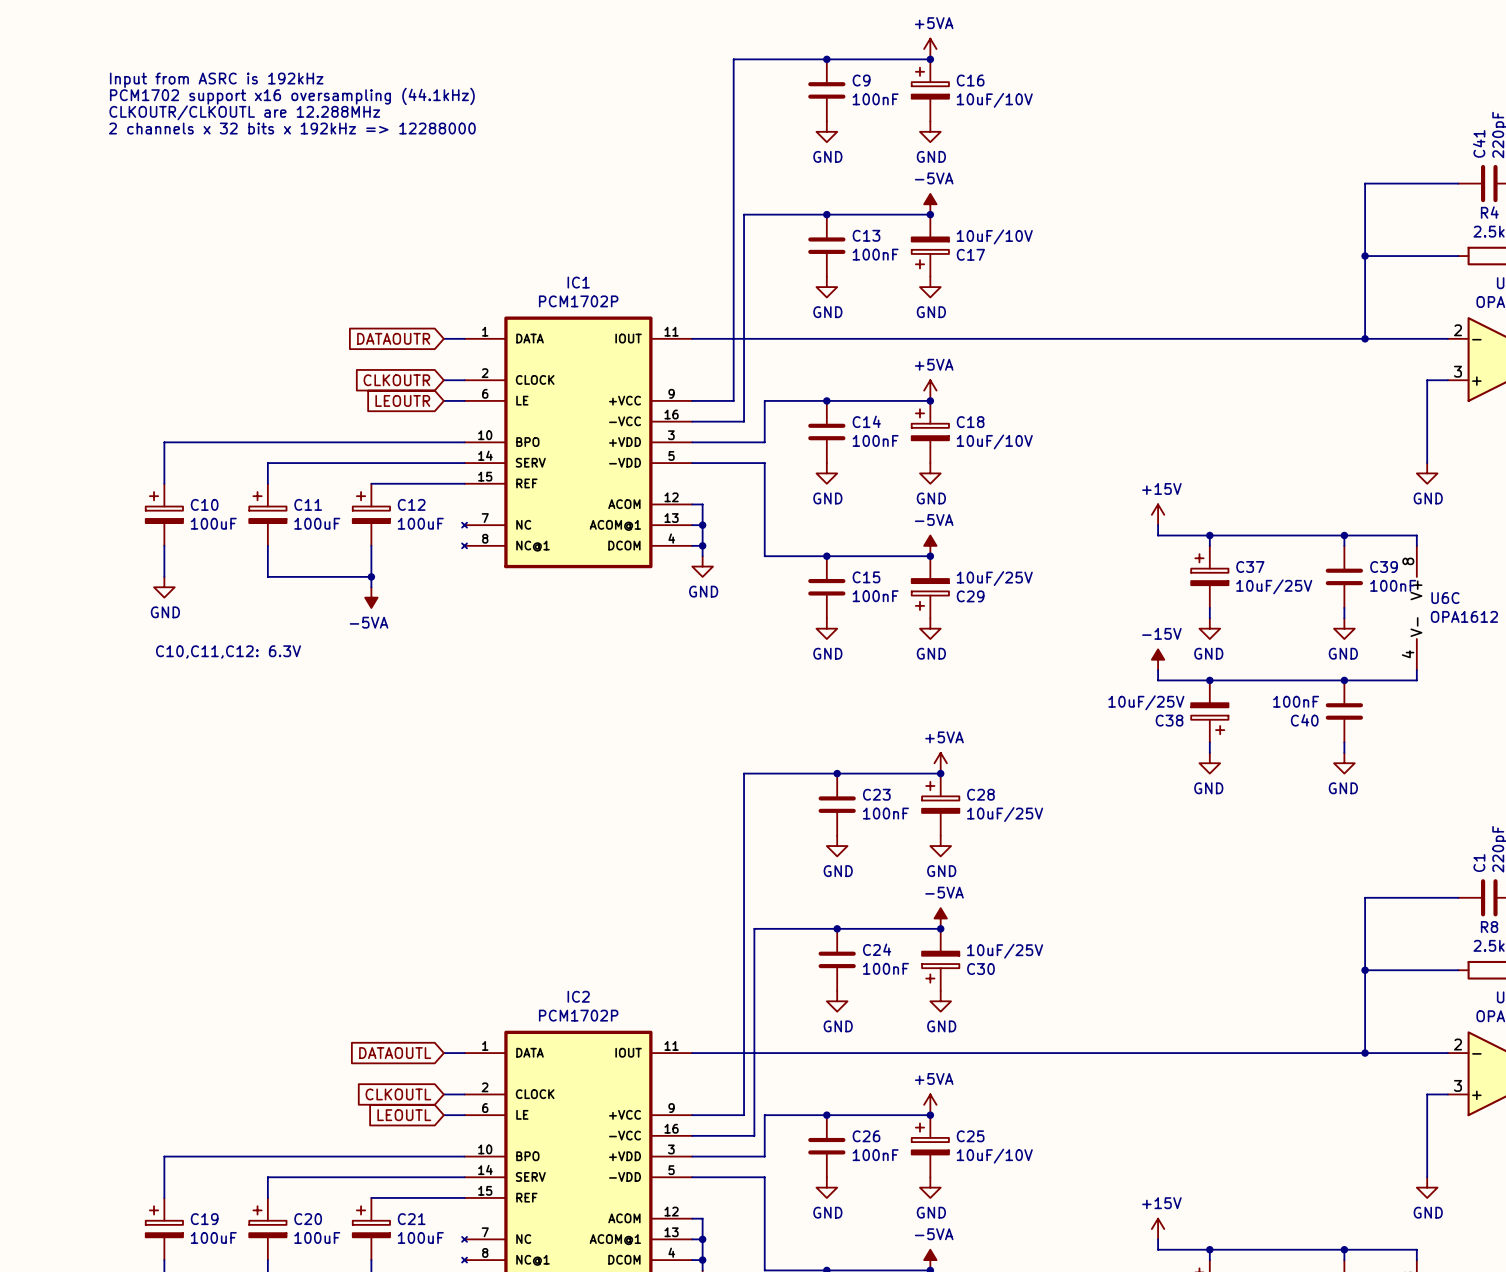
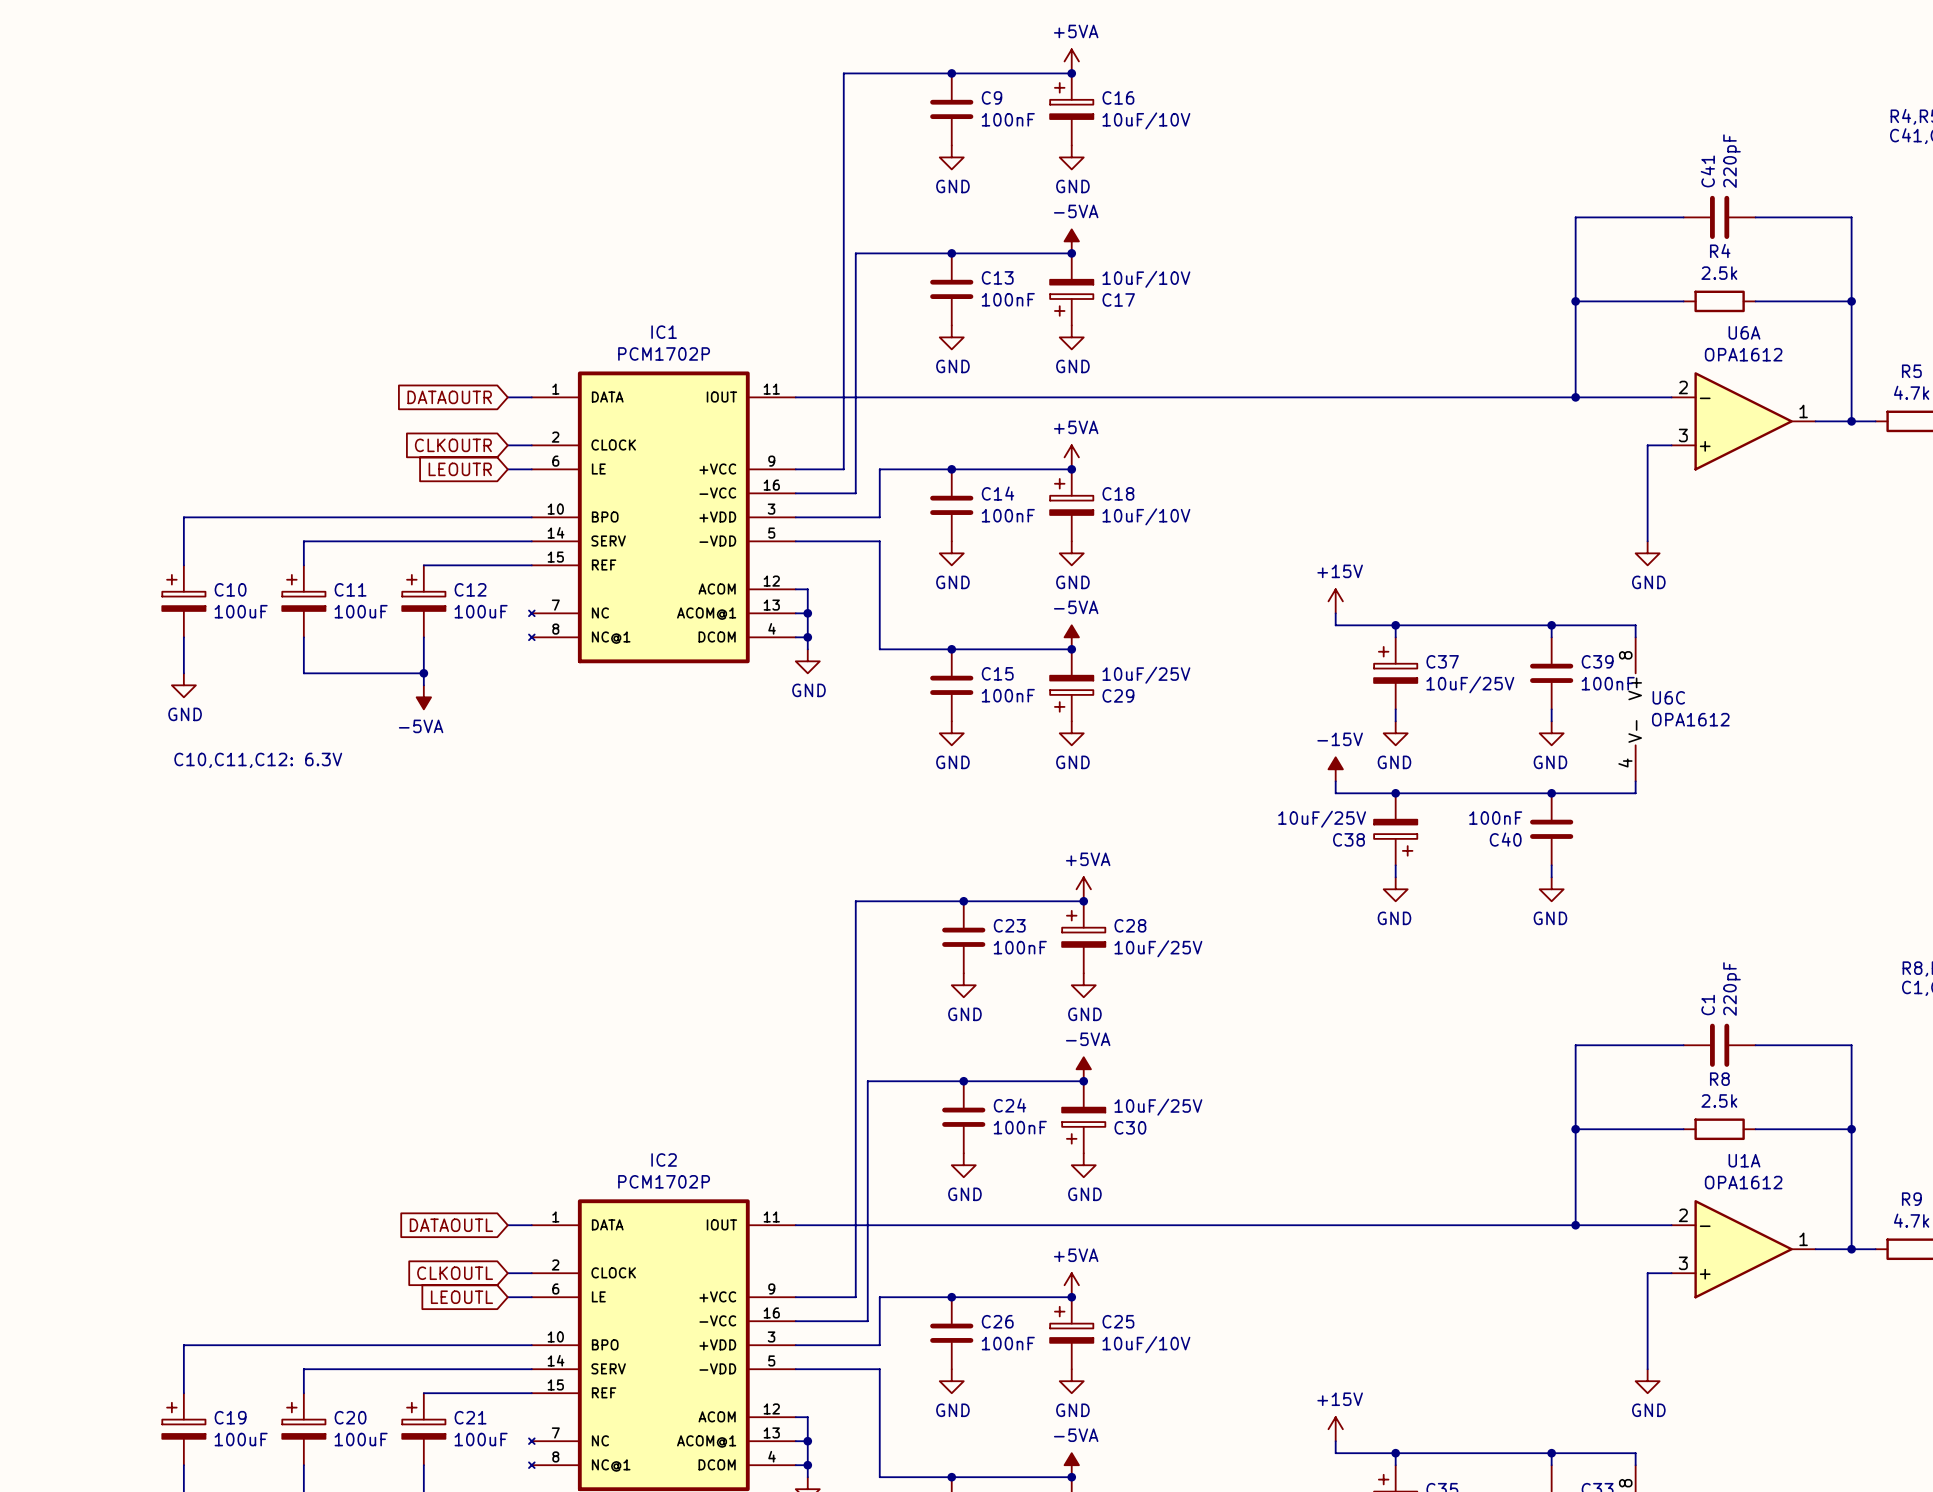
text: Input from ASRC is 192kHz (216, 80) -> none
text: PCM1702 support x16 oversampling (44.1kHz) (292, 96) -> none
text: CLKOUTR/CLKOUTL are 12.288MHz (244, 112) -> none
text: 2 channels x 32 bits x 192kHz => 12288000 (292, 128) -> none

